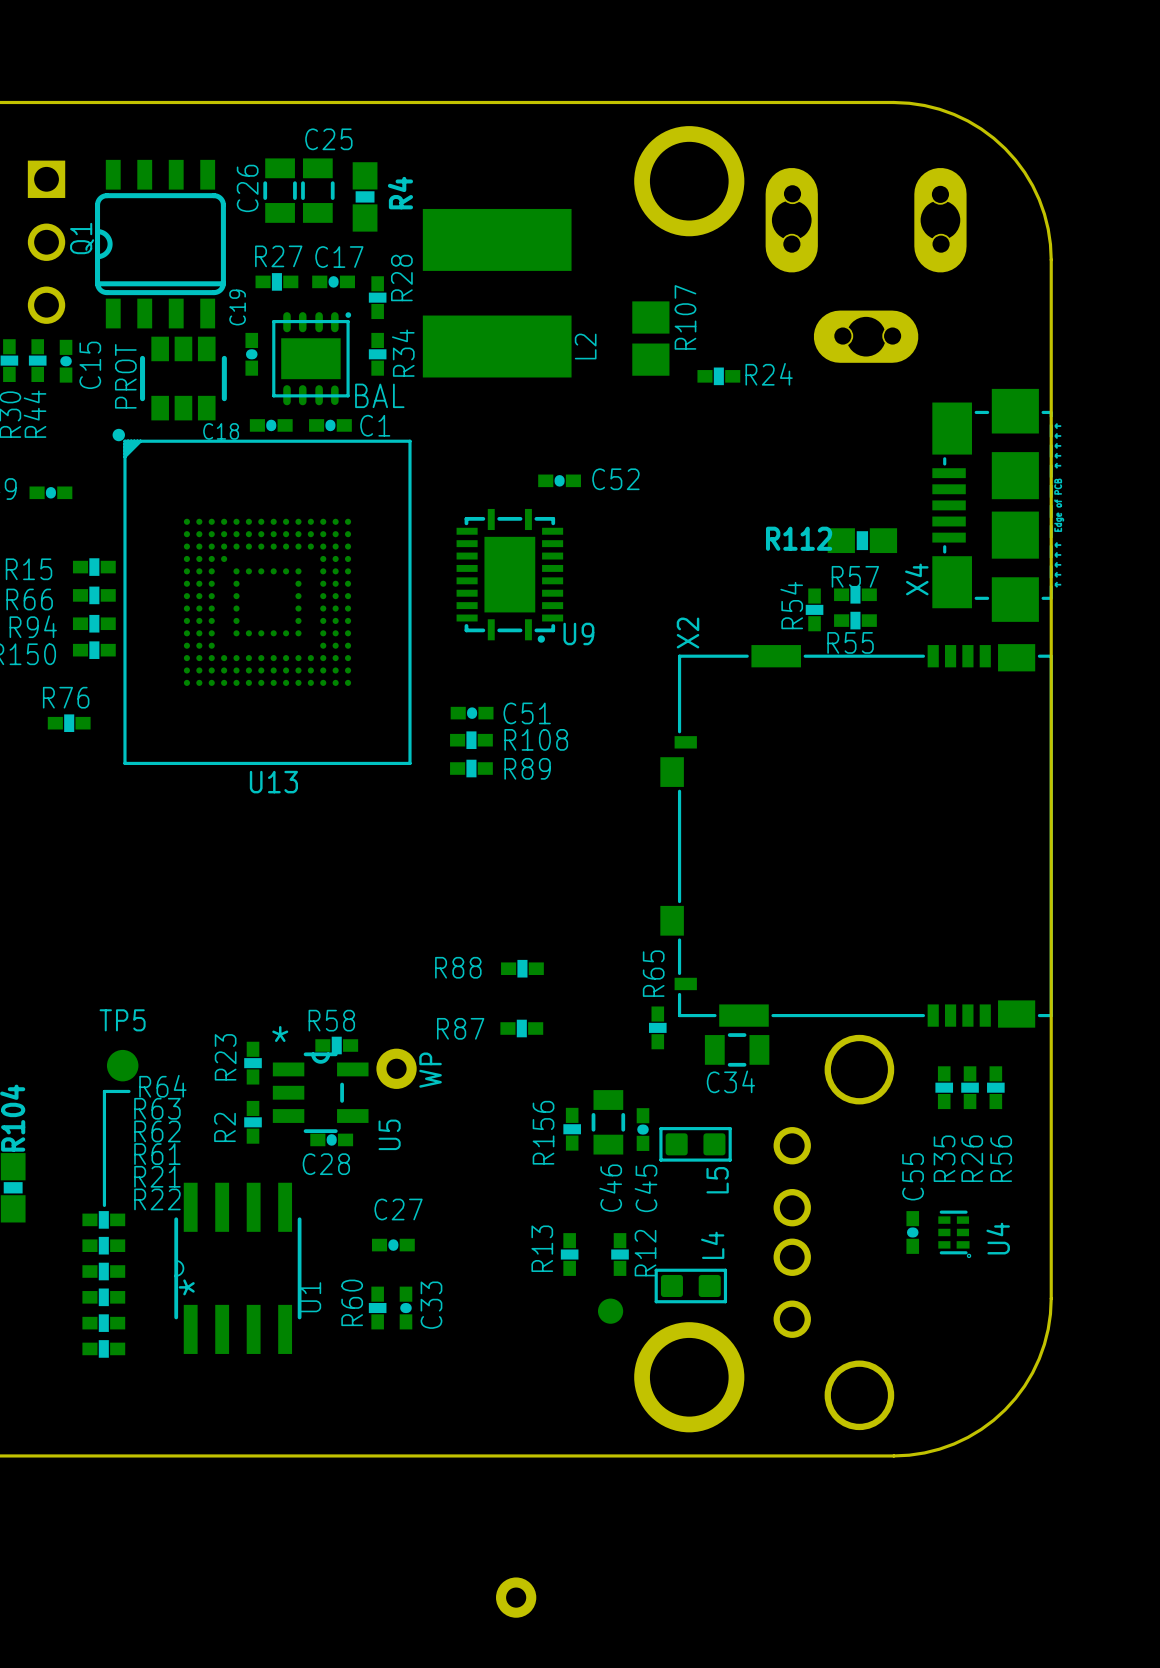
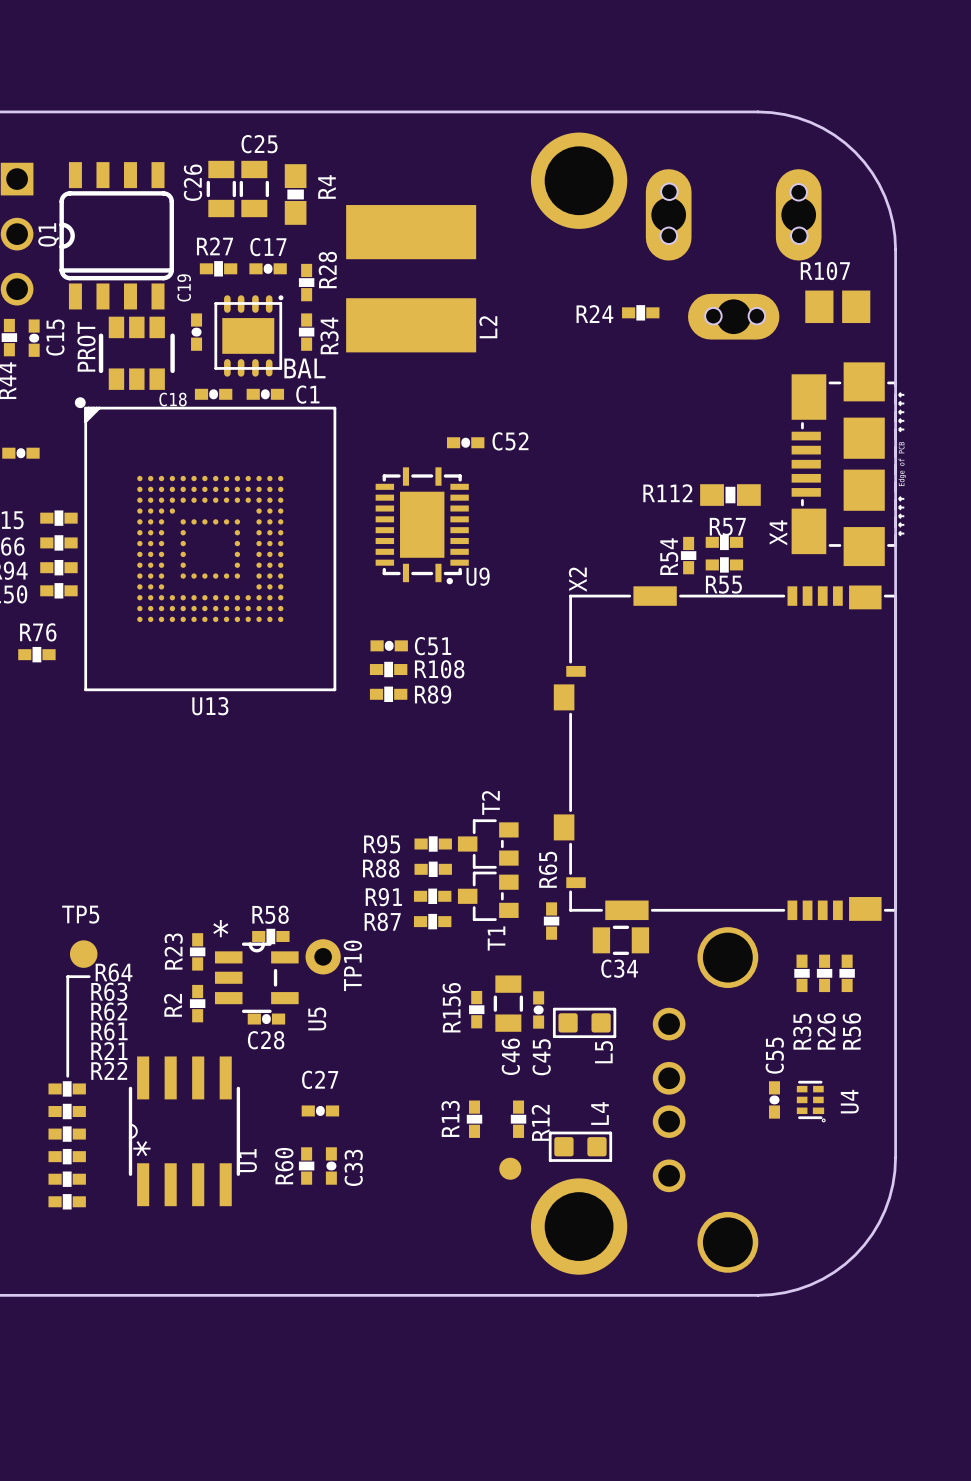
R107 rotation: 0° (650, 338) -> 90° clockwise (837, 306)
R107 position: (650, 338) -> (837, 306)
R24 name position: R24 (769, 374) -> R24 (594, 314)
R24 position: (718, 376) -> (640, 312)
R95: none -> (433, 844)
T2: none -> (488, 844)
R91: none -> (432, 896)
T1: none -> (488, 896)
WP name: WP (430, 1070) -> TP10 (352, 965)
part: (516, 1597) -> none

